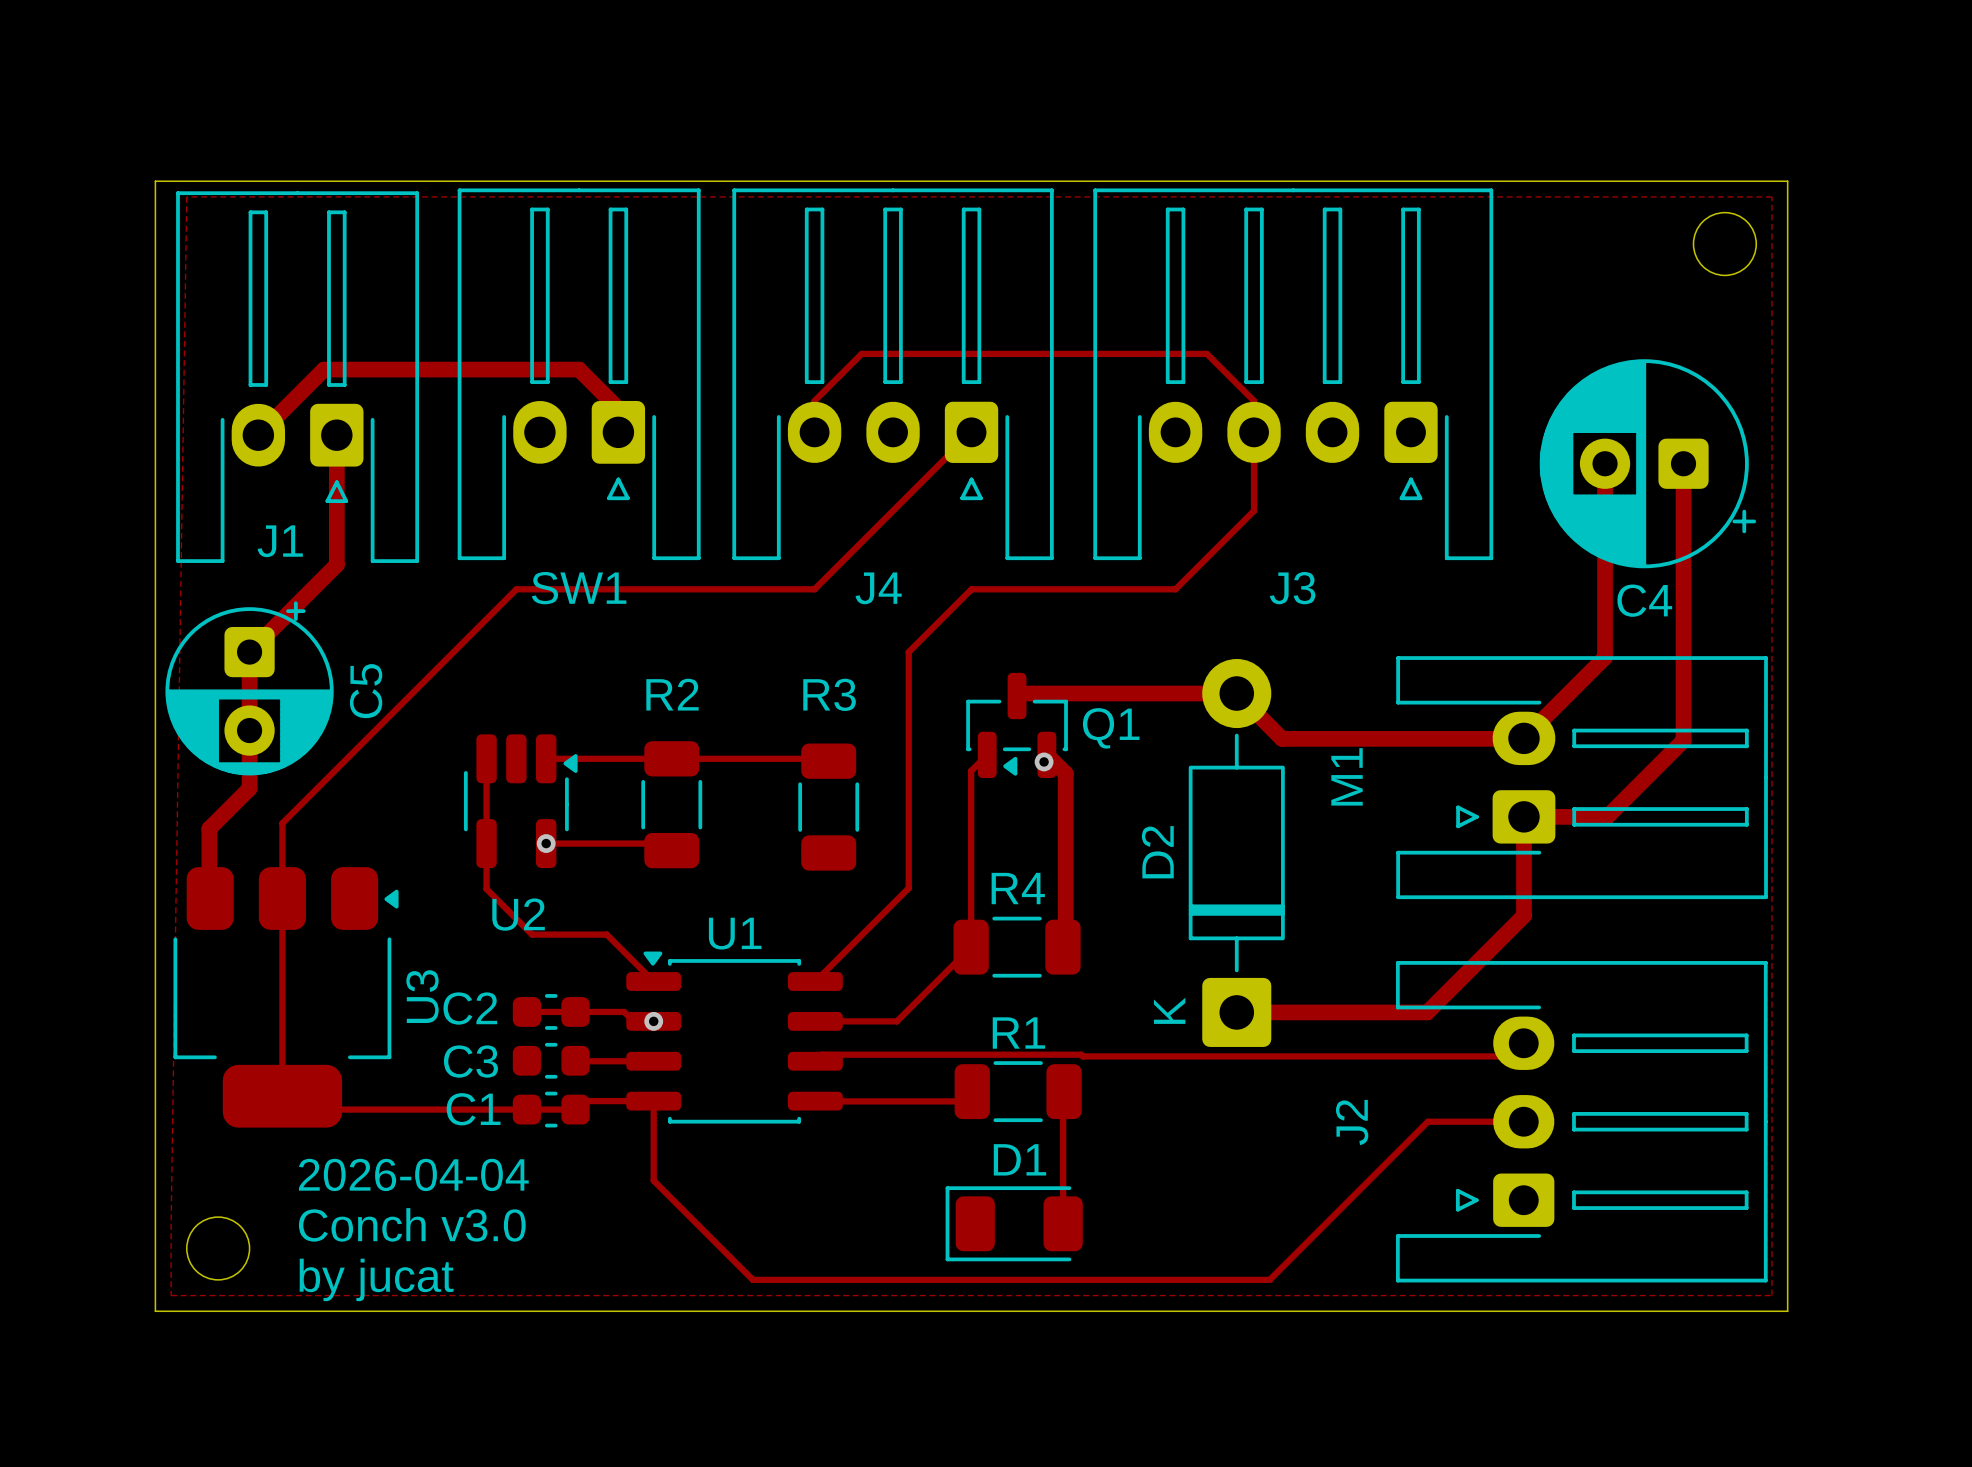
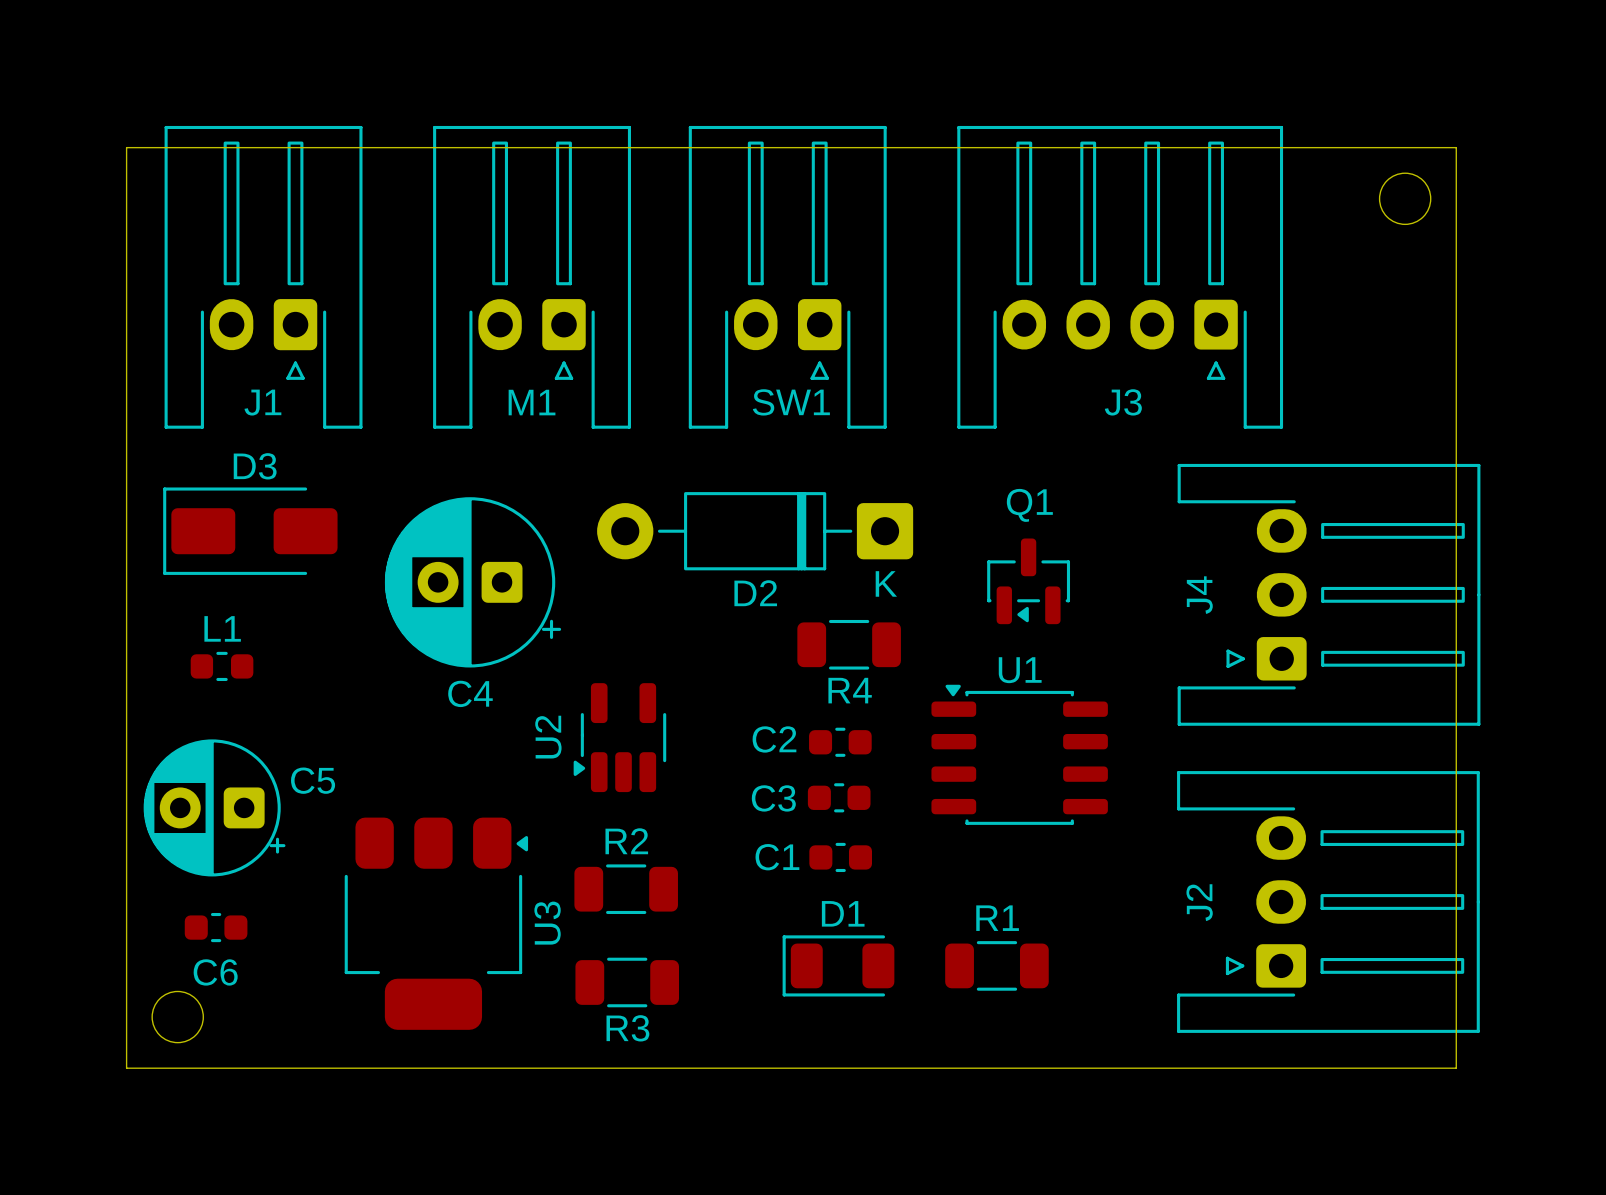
zone outline: (186, 196) (1771, 196) (1771, 1295) (171, 1295) (186, 196) -> none
SW1 position: (579, 374) -> (787, 277)
J4 rotation: 0° (893, 374) -> 90° clockwise (1329, 594)
J4 position: (893, 374) -> (1329, 594)
J3 position: (1293, 374) -> (1120, 277)
J1 position: (297, 377) -> (263, 277)
track: (618, 432) (618, 408) (579, 369) (323, 369) (258, 435) -> none
track: (814, 432) (814, 400) (861, 353) (1206, 353) (1254, 400) (1254, 510) (1175, 589) (971, 589) (908, 652) (908, 888) (815, 981) -> none
track: (971, 432) (814, 589) (516, 589) (282, 823) (282, 895) -> none
track: (336, 435) (336, 564) (249, 652) (249, 788) (209, 828) (210, 898) -> none
track: (1605, 463) (1605, 657) (1523, 738) (1282, 738) (1236, 693) -> none
C4 position: (1647, 463) -> (473, 582)
track: (1683, 463) (1683, 740) (1607, 816) (1523, 816) (1523, 915) (1427, 1012) (1236, 1012) -> none
J1 name position: J1 (280, 541) -> J1 (262, 402)
SW1 name position: SW1 (579, 588) -> SW1 (791, 402)
J3 name position: J3 (1292, 588) -> J3 (1123, 402)
D3: none -> (250, 531)
C5 rotation: 0° (249, 688) -> 90° clockwise (214, 807)
C5 position: (249, 688) -> (214, 807)
track: (1236, 693) (1019, 693) (1017, 696) -> none
R3 name position: R3 (829, 694) -> R3 (627, 1028)
Q1 position: (1017, 725) -> (1028, 581)
Q1 name position: Q1 (1111, 728) -> Q1 (1029, 505)
track: (987, 754) (971, 770) (971, 947) (896, 1021) (815, 1021) -> none
track: (1046, 754) (1065, 773) (1065, 944) (1062, 947) -> none
track: (486, 758) (486, 889) (532, 934) (606, 934) (653, 981) -> none
track: (546, 758) (826, 758) (828, 761) -> none
via: (1044, 761) -> none
M1 name position: M1 (1347, 776) -> M1 (532, 402)
M1 rotation: 0° (1582, 777) -> 90° counterclockwise (532, 277)
M1 position: (1582, 777) -> (532, 277)
U2 rotation: 0° (520, 801) -> 180° (619, 737)
U2 position: (520, 801) -> (619, 737)
R2 rotation: 0° (671, 804) -> 90° clockwise (626, 889)
R2 position: (671, 804) -> (626, 889)
R3 rotation: 0° (828, 807) -> 90° clockwise (627, 982)
R3 position: (828, 807) -> (627, 982)
L1: none -> (222, 666)
track: (546, 843) (664, 843) (671, 850) -> none
via: (546, 843) -> none
D2 rotation: 0° (1236, 852) -> 90° counterclockwise (755, 531)
D2 position: (1236, 852) -> (755, 531)
R4 name position: R4 (1018, 888) -> R4 (850, 690)
track: (282, 898) (282, 1096) (295, 1109) (575, 1109) (584, 1101) (653, 1101) (653, 1180) (752, 1279) (1269, 1279) (1427, 1121) (1523, 1121) -> none
U2 name position: U2 (518, 914) -> U2 (548, 737)
R4 position: (1017, 947) -> (849, 644)
U3 position: (286, 997) -> (436, 923)
track: (526, 1011) (624, 1011) (633, 1021) (653, 1021) -> none
C2 position: (551, 1011) -> (840, 742)
via: (653, 1021) -> none
U1 position: (734, 1037) -> (1019, 754)
track: (1523, 1043) (1510, 1056) (821, 1054) (815, 1061) -> none
C3 position: (551, 1060) -> (839, 797)
track: (652, 1060) (575, 1060) -> none
track: (972, 1091) (962, 1101) (815, 1101) -> none
R1 position: (1018, 1091) -> (996, 965)
track: (1064, 1091) (1063, 1223) -> none
C1 position: (551, 1109) -> (840, 857)
J2 position: (1581, 1121) -> (1328, 901)
J2 name position: J2 (1352, 1122) -> J2 (1199, 902)
C6: none -> (216, 927)
text: 2026-04-04 (413, 1174) -> none
D1 position: (1014, 1223) -> (838, 965)
text: Conch v3.0 (412, 1224) -> none
text: by jucat (376, 1279) -> none

